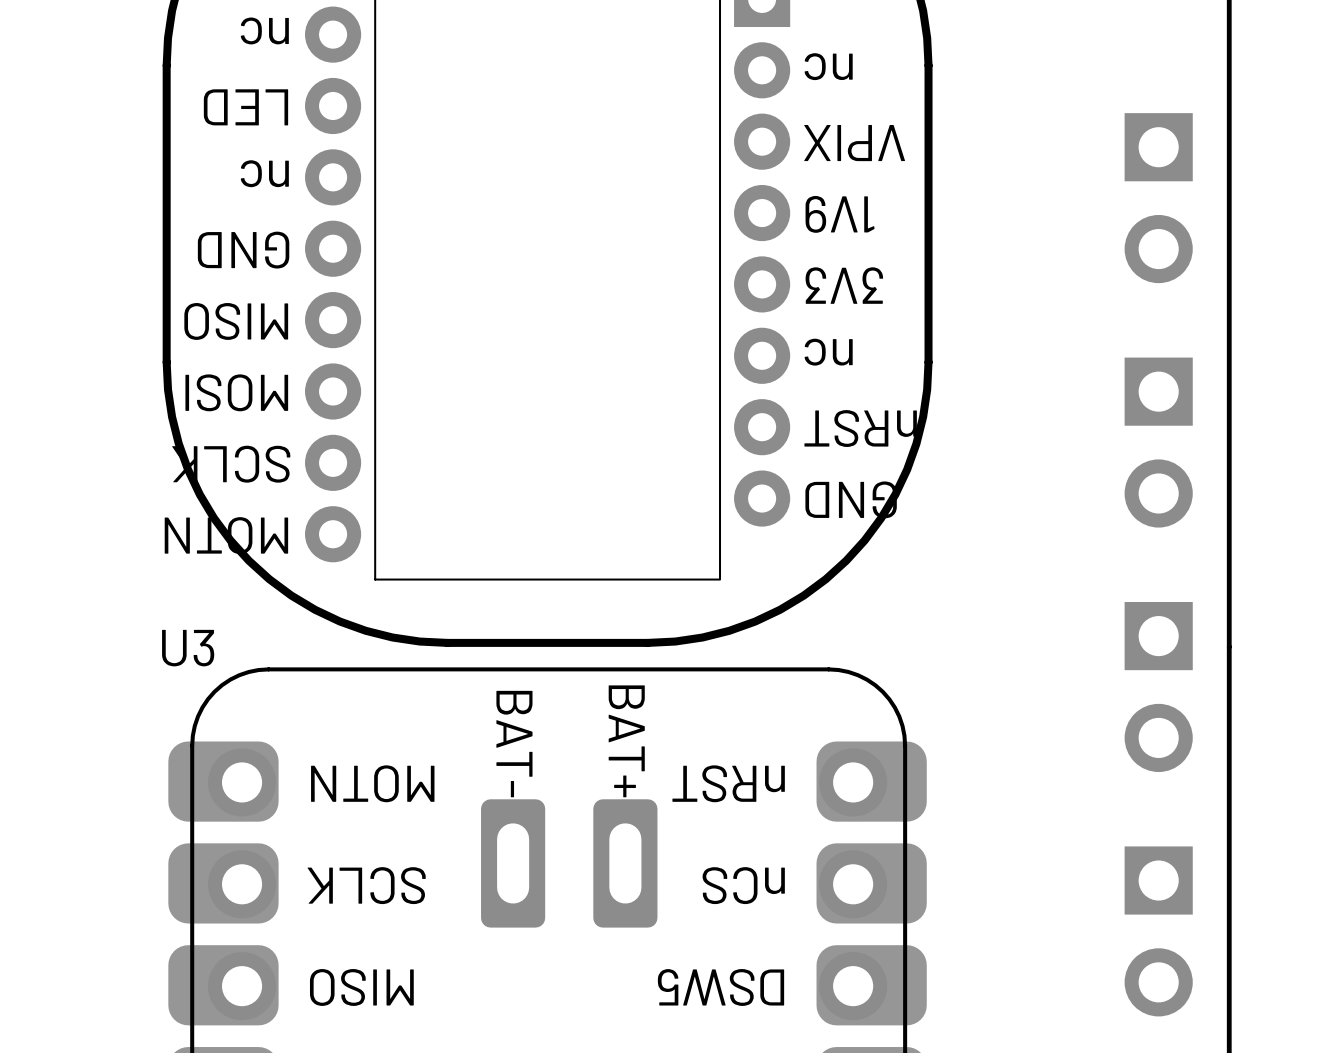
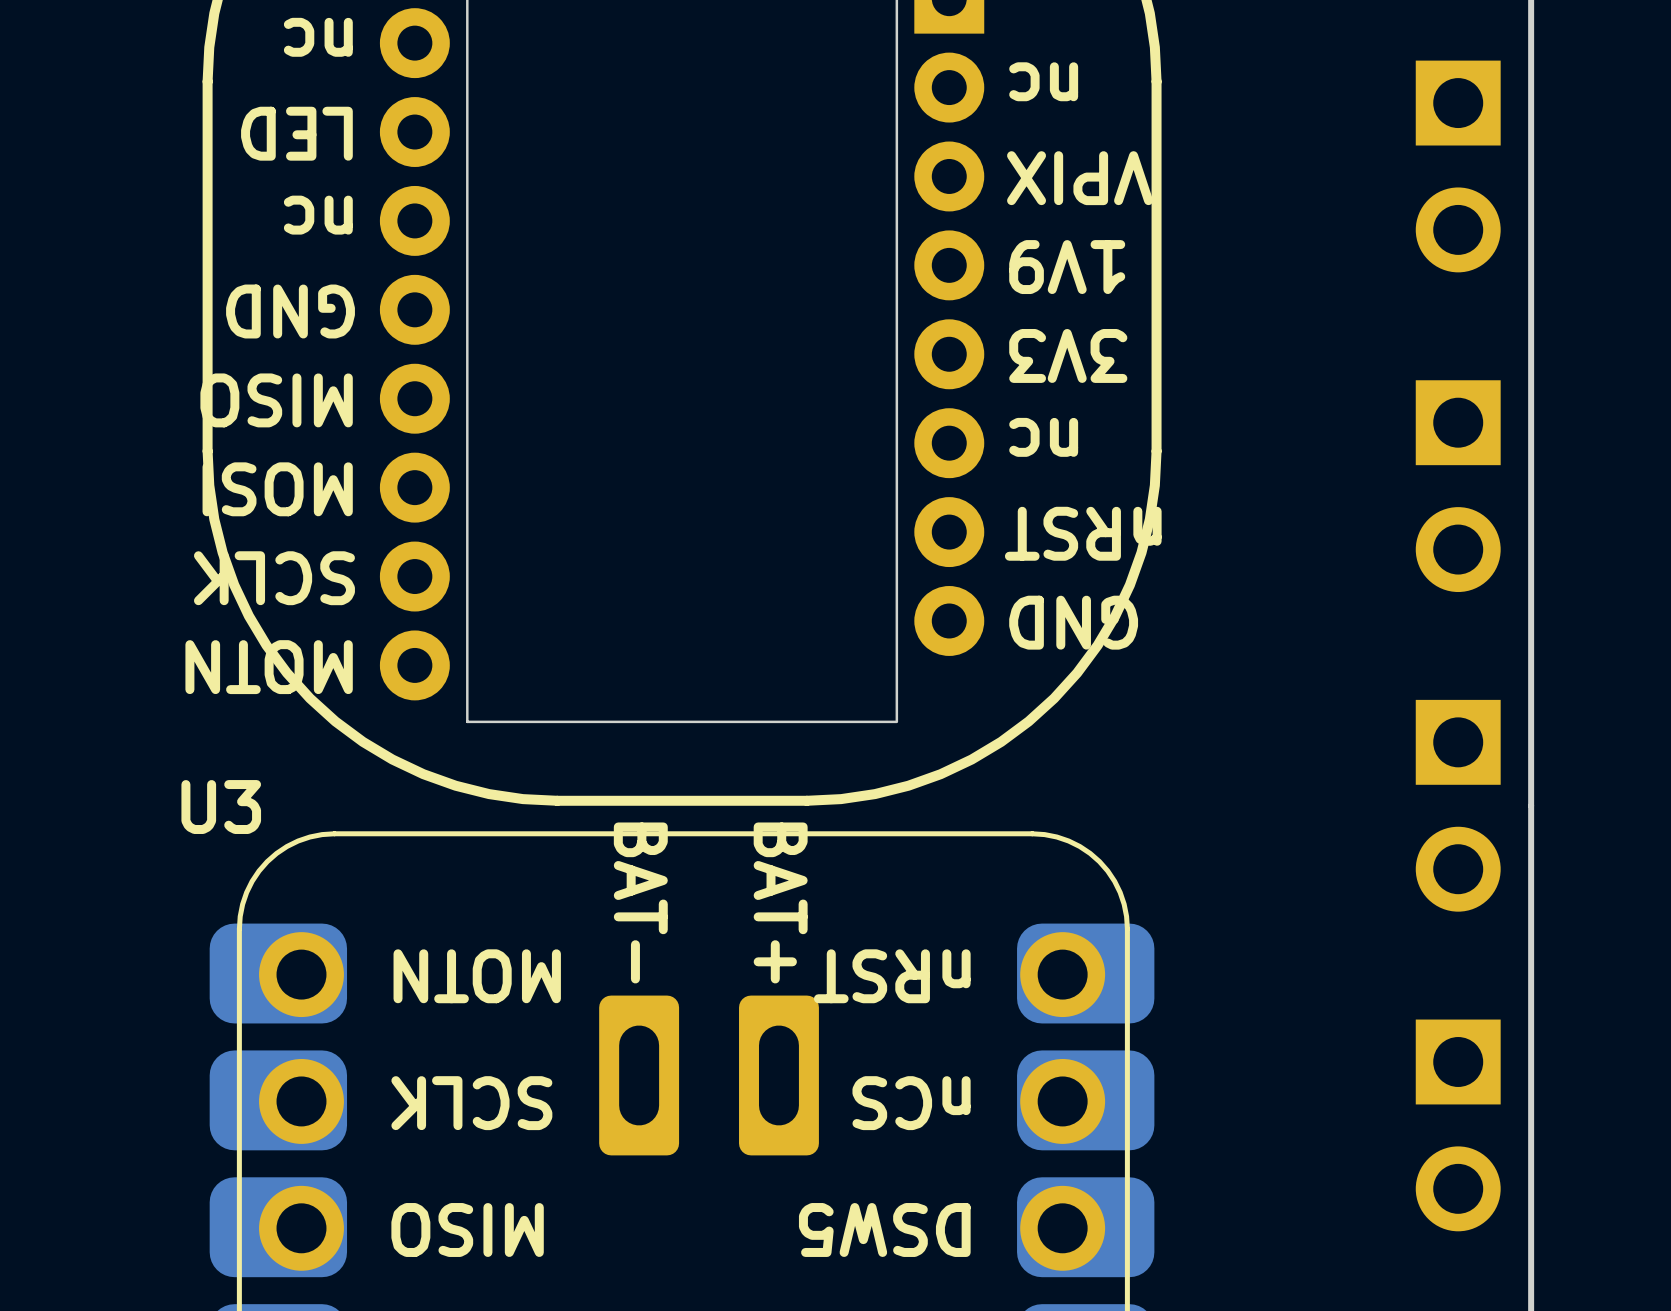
part position: (1158, 198) -> (1458, 166)
part position: (1158, 442) -> (1458, 486)
part position: (1158, 687) -> (1458, 805)
part position: (1158, 931) -> (1458, 1125)

